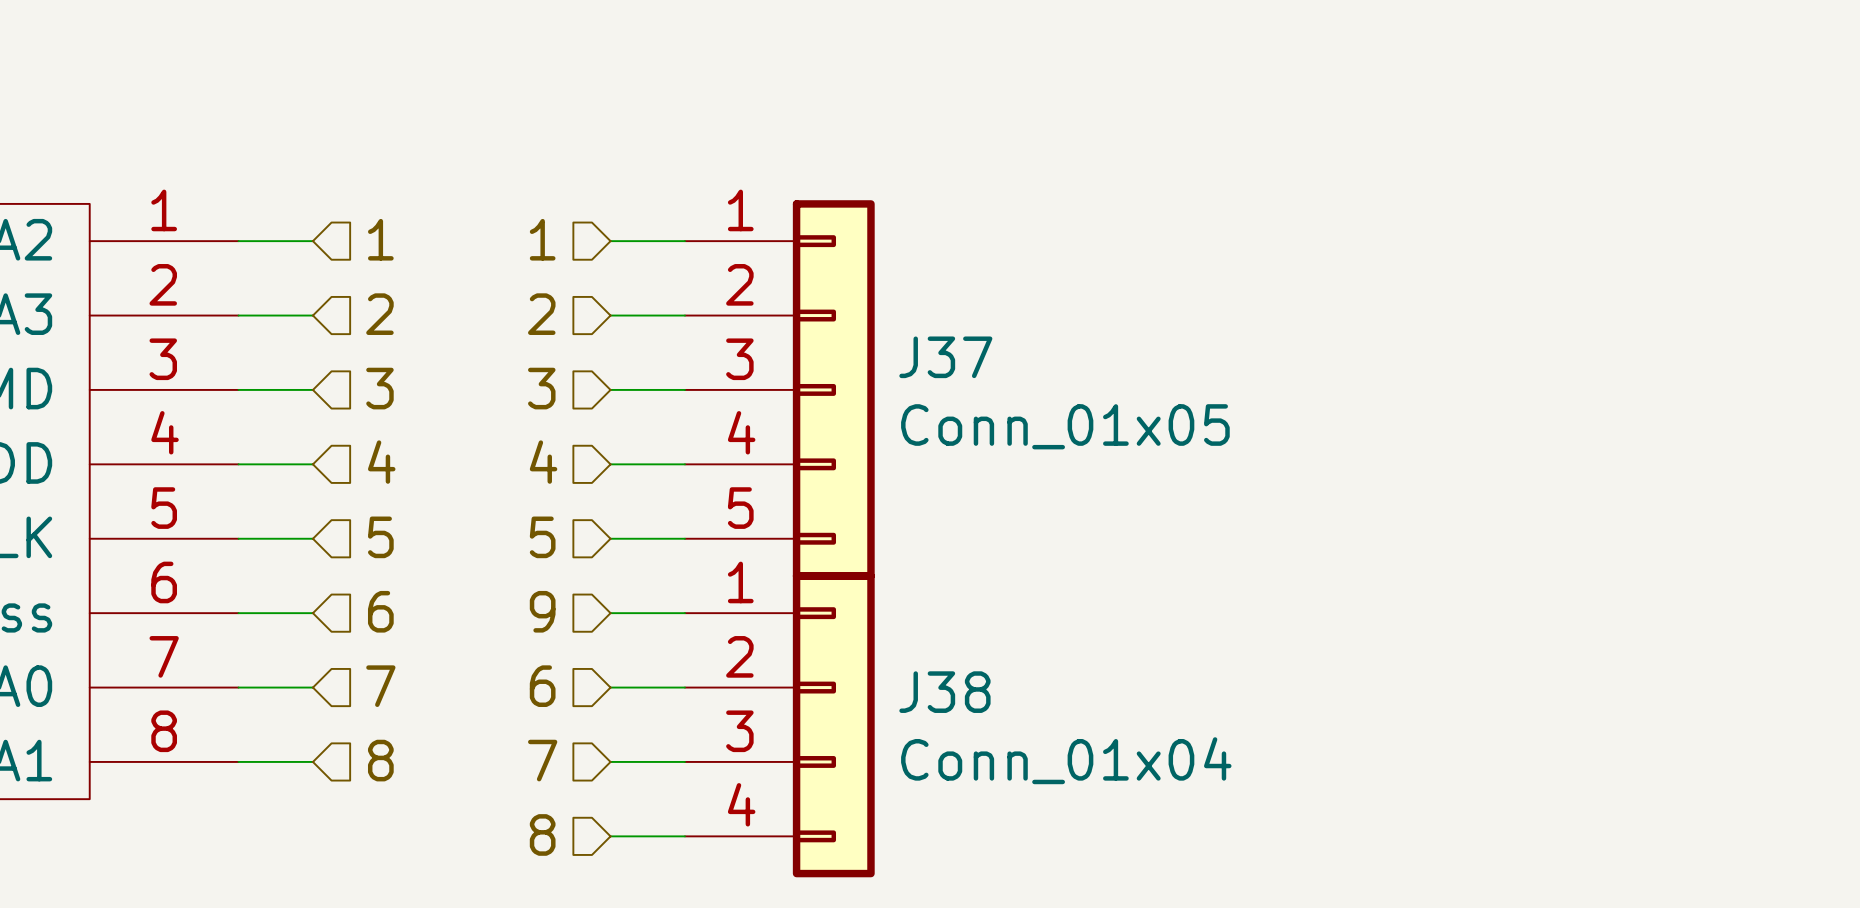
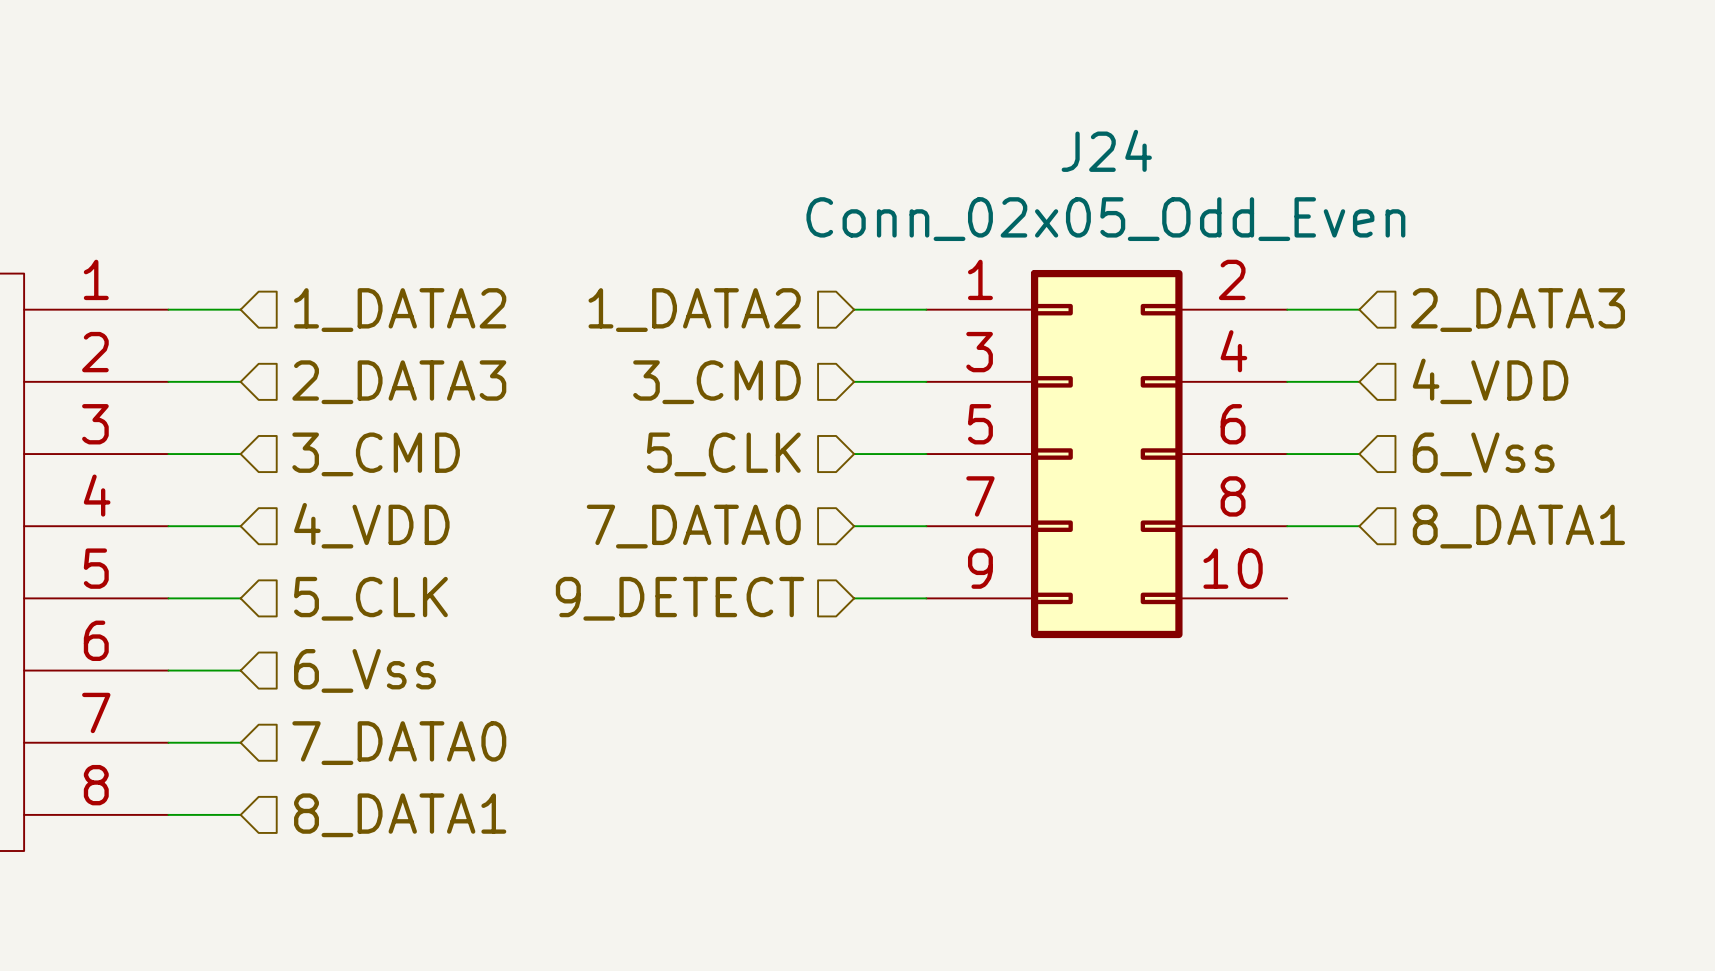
hierarchical label: 1 (380, 239) -> 1_DATA2 (400, 310)
hierarchical label: 1 (542, 239) -> none
wire: (610, 241) (684, 241) -> (854, 309) (926, 309)
hierarchical label: none -> 1_DATA2 (694, 310)
wire: none -> (1287, 309) (1359, 309)
hierarchical label: none -> 2_DATA3 (1518, 310)
hierarchical label: 2 (379, 314) -> 2_DATA3 (399, 382)
hierarchical label: 2 (541, 314) -> none
wire: (610, 315) (684, 315) -> (854, 381) (926, 381)
hierarchical label: none -> 3_CMD (716, 382)
wire: none -> (1287, 381) (1359, 381)
hierarchical label: none -> 4_VDD (1490, 381)
hierarchical label: 3 (379, 388) -> 3_CMD (376, 454)
hierarchical label: 3 (541, 388) -> none
wire: (610, 389) (684, 389) -> (854, 454) (926, 454)
J37: Conn_01x05 (779, 389) -> none
J24: none -> Conn_02x05_Odd_Even (1106, 454)
wire: none -> (1287, 454) (1359, 454)
hierarchical label: none -> 5_CLK (723, 454)
hierarchical label: none -> 6_Vss (1483, 454)
hierarchical label: 4 (381, 462) -> 4_VDD (371, 525)
hierarchical label: 4 (543, 462) -> none
wire: (610, 464) (684, 464) -> (854, 526) (926, 526)
hierarchical label: none -> 7_DATA0 (693, 526)
wire: none -> (1287, 526) (1359, 526)
hierarchical label: none -> 8_DATA1 (1518, 526)
hierarchical label: 5 (380, 537) -> 5_CLK (370, 598)
hierarchical label: 5 (542, 537) -> none
wire: (610, 538) (684, 538) -> (854, 598) (926, 598)
hierarchical label: none -> 9_DETECT (680, 598)
hierarchical label: 6 (380, 611) -> 6_Vss (364, 670)
hierarchical label: 9 (542, 611) -> none
wire: (610, 613) (684, 613) -> none
hierarchical label: 7 (380, 686) -> 7_DATA0 (399, 743)
hierarchical label: 6 (542, 686) -> none
wire: (610, 687) (684, 687) -> none
J38: Conn_01x04 (779, 724) -> none
hierarchical label: 8 (380, 760) -> 8_DATA1 (400, 815)
hierarchical label: 7 (542, 760) -> none
wire: (610, 761) (684, 761) -> none
hierarchical label: 8 (542, 834) -> none
wire: (610, 836) (684, 836) -> none

